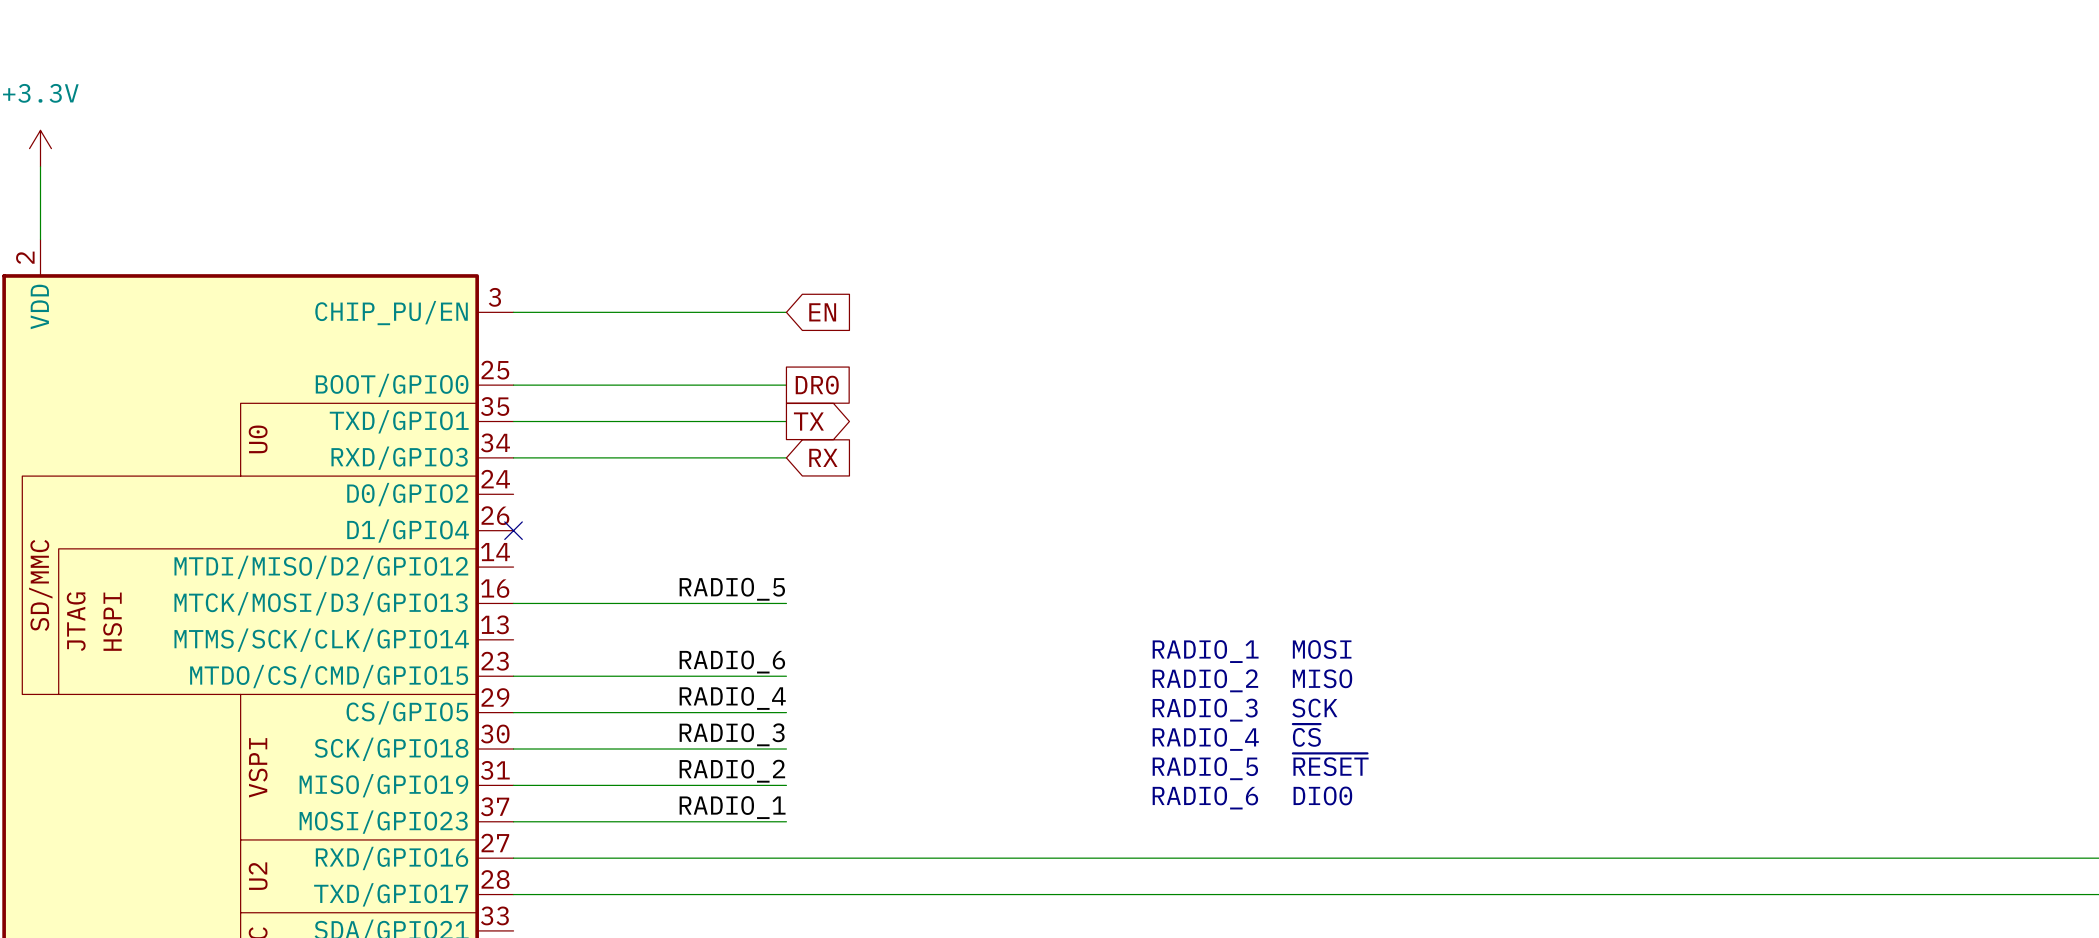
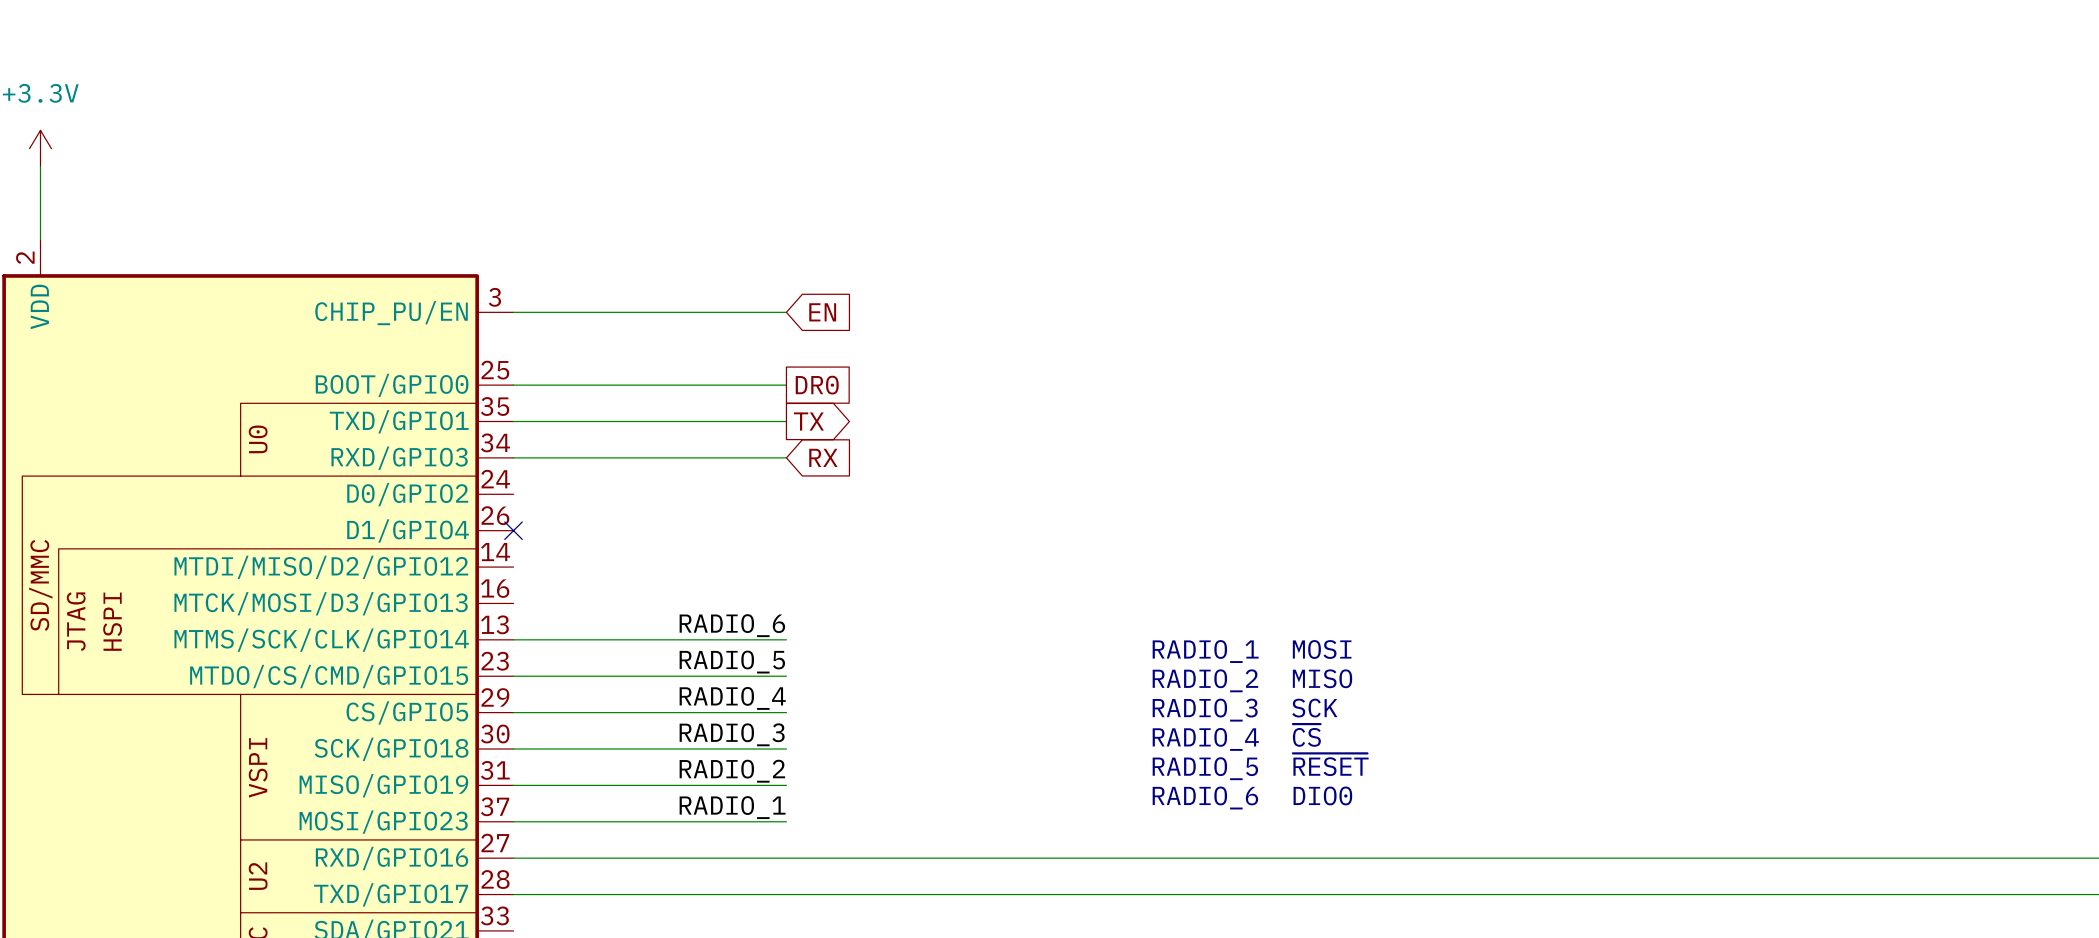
label: RADIO_5 (732, 589) -> RADIO_6 (732, 625)
wire: (513, 603) (786, 603) -> (513, 639) (786, 639)
label: RADIO_6 (732, 662) -> RADIO_5 (732, 662)

